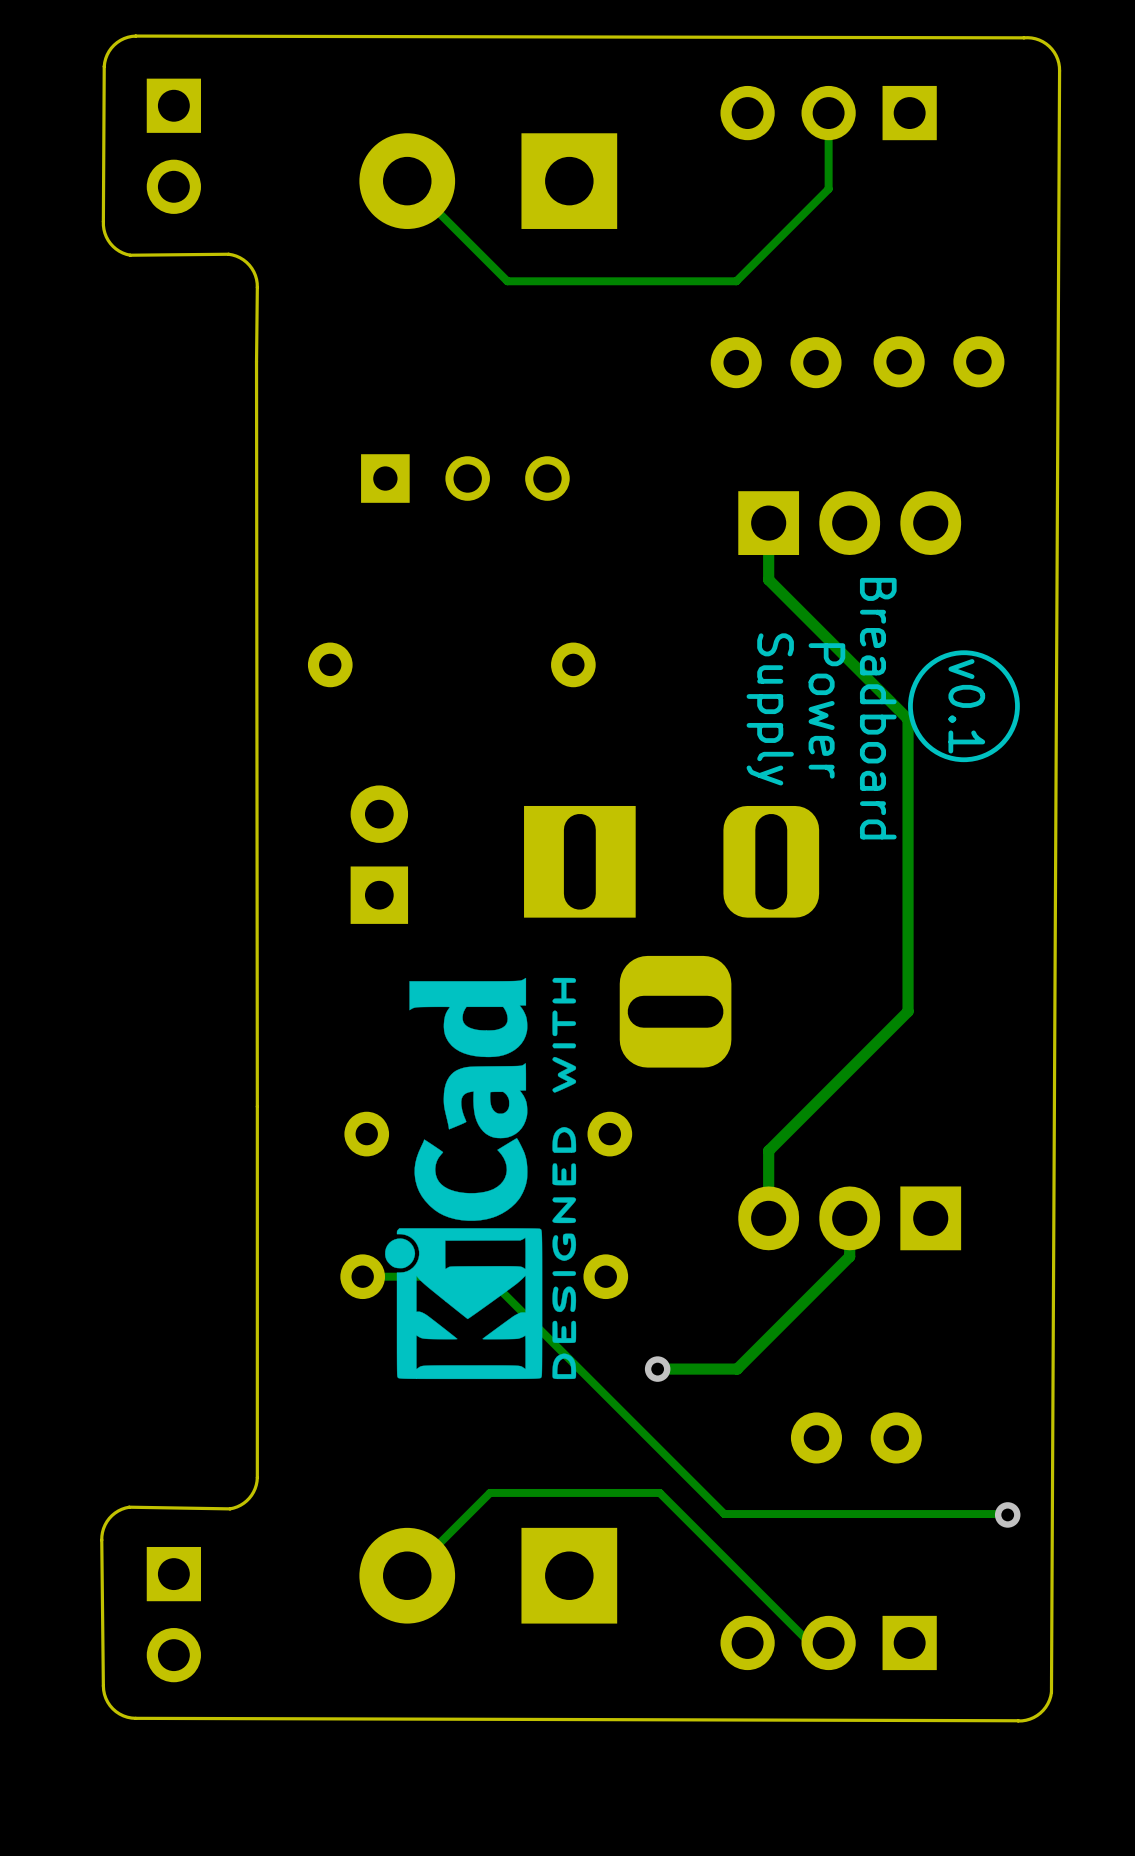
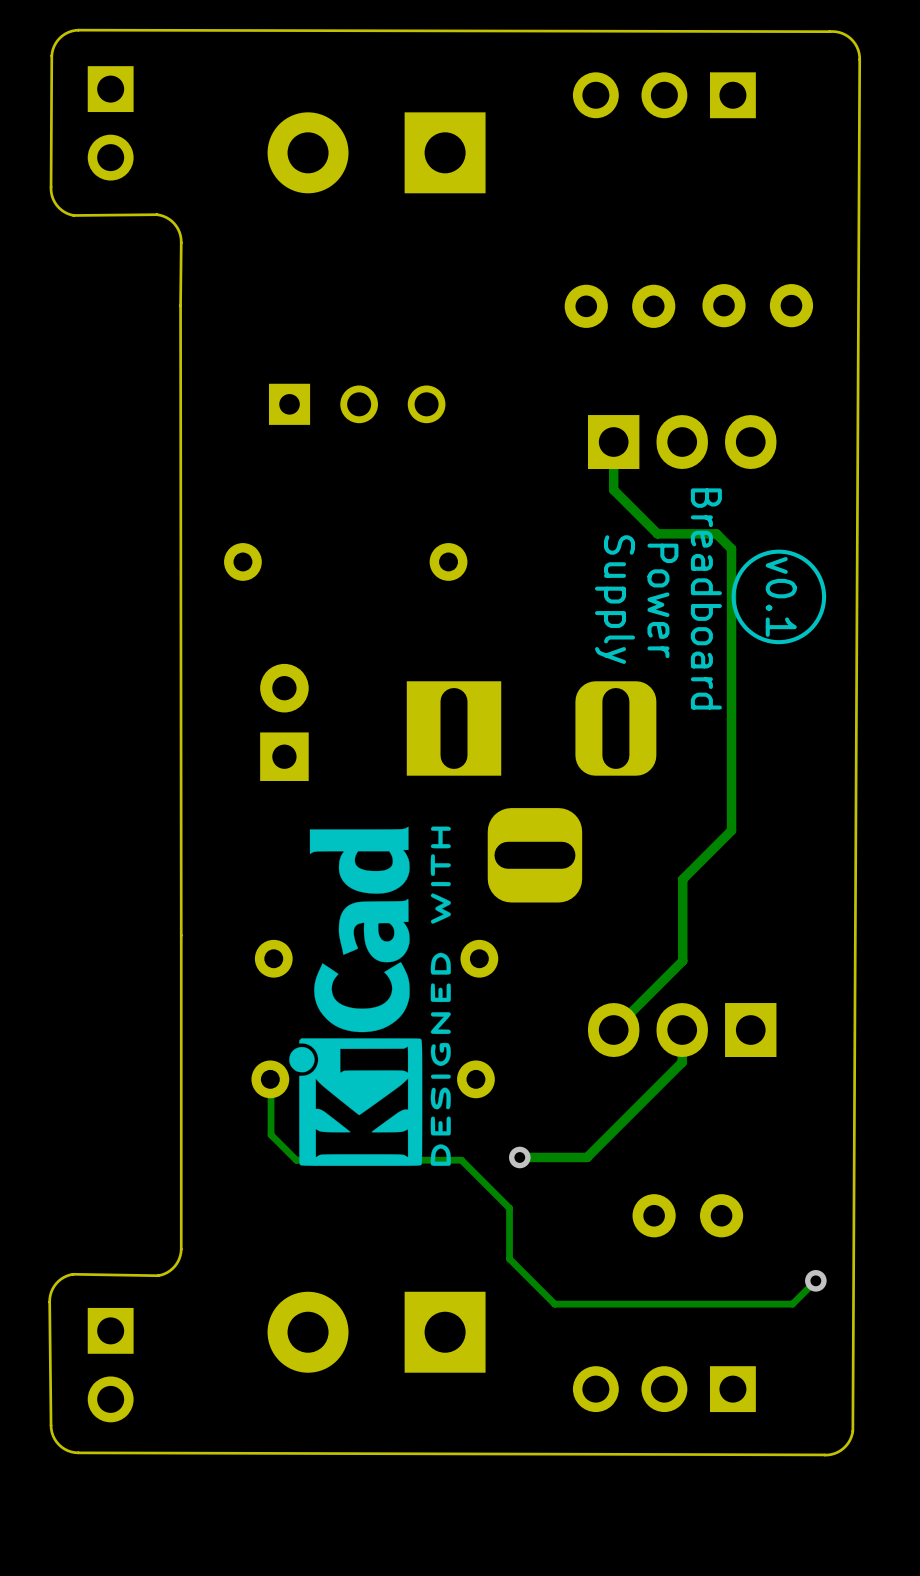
track: (828, 113) (828, 189) (736, 281) (507, 281) (407, 181) -> none
track: (820, 631) (908, 719) -> (657, 533) (716, 533) (731, 548) (731, 607)
track: (908, 982) (908, 1011) (768, 1150) (768, 1218) -> (731, 830) (682, 879) (682, 960) (613, 1030)
track: (363, 1276) (486, 1276) (724, 1514) (1007, 1514) -> (271, 1079) (271, 1134) (296, 1160) (461, 1160) (509, 1208) (509, 1258) (554, 1304) (792, 1304) (815, 1280)
track: (407, 1575) (490, 1492) (659, 1492) (809, 1642) (828, 1642) -> none

